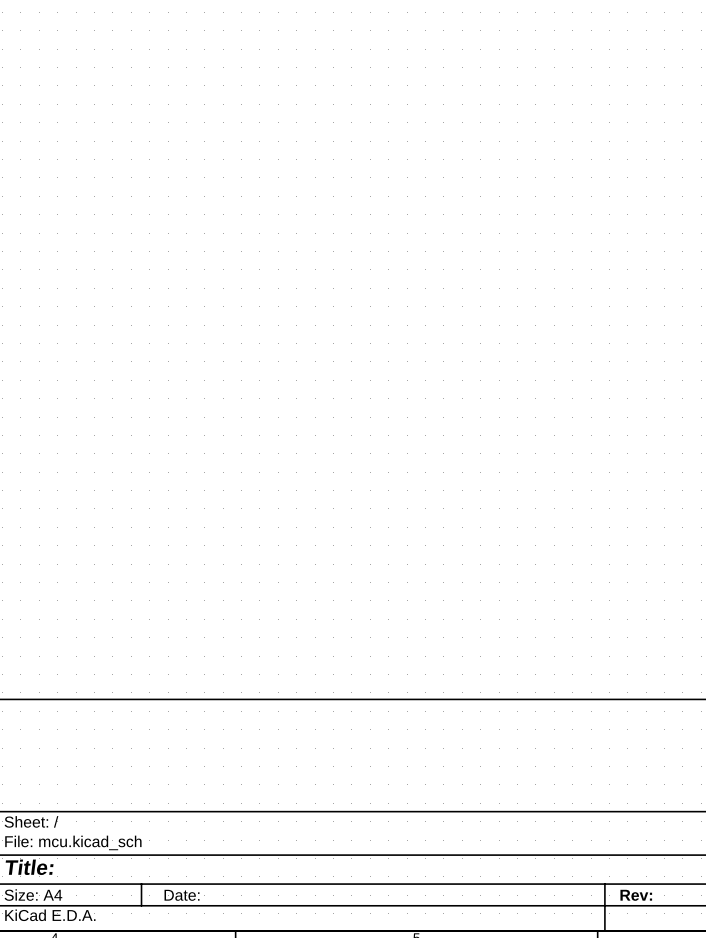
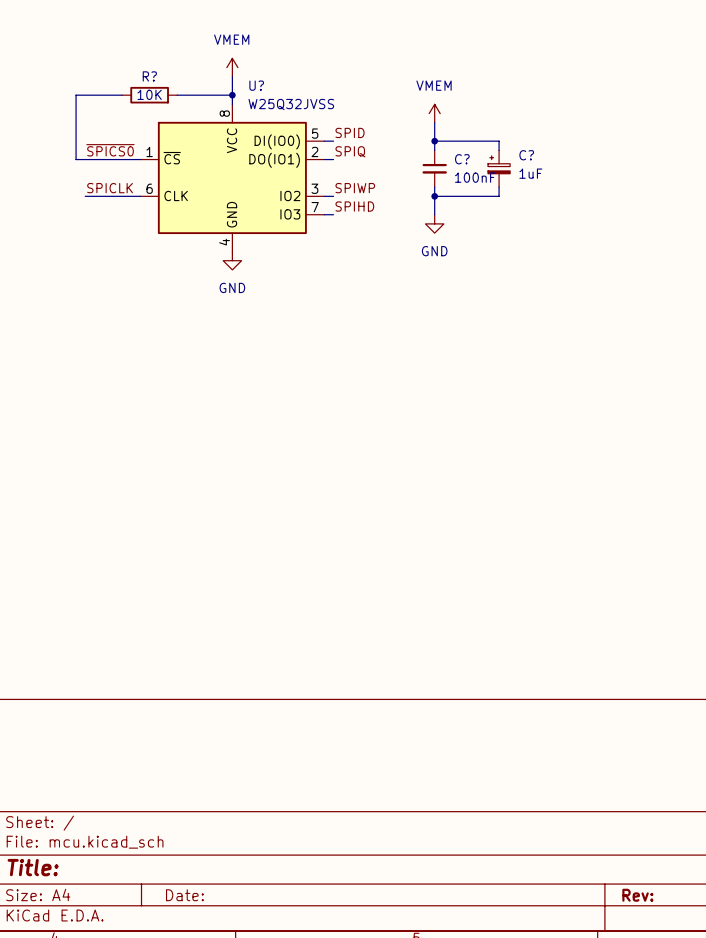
power symbol: none -> VMEM (232, 67)
wire: none -> (232, 76) (232, 104)
wire: none -> (122, 95) (76, 95) (76, 159) (140, 159)
R?: none -> 10K (149, 95)
wire: none -> (177, 95) (232, 95)
junction: none -> (232, 95)
power symbol: none -> VMEM (434, 113)
wire: none -> (434, 122) (434, 150)
label: none -> SPID (350, 132)
wire: none -> (324, 141) (333, 141)
wire: none -> (434, 141) (499, 141) (499, 150)
junction: none -> (434, 141)
label: none -> ~{SPICS0} (110, 150)
label: none -> SPIQ (350, 151)
wire: none -> (324, 159) (333, 159)
C?: none -> 100nF (434, 168)
C?: none -> 1uF (499, 168)
U?: none -> W25Q32JVSS (232, 177)
wire: none -> (434, 187) (434, 214)
wire: none -> (499, 187) (499, 196) (434, 196)
label: none -> SPICLK (110, 188)
label: none -> SPIWP (355, 188)
wire: none -> (85, 196) (140, 196)
wire: none -> (324, 196) (333, 196)
junction: none -> (434, 196)
label: none -> SPIHD (354, 206)
wire: none -> (324, 214) (333, 214)
power symbol: none -> GND (434, 223)
power symbol: none -> GND (232, 260)

